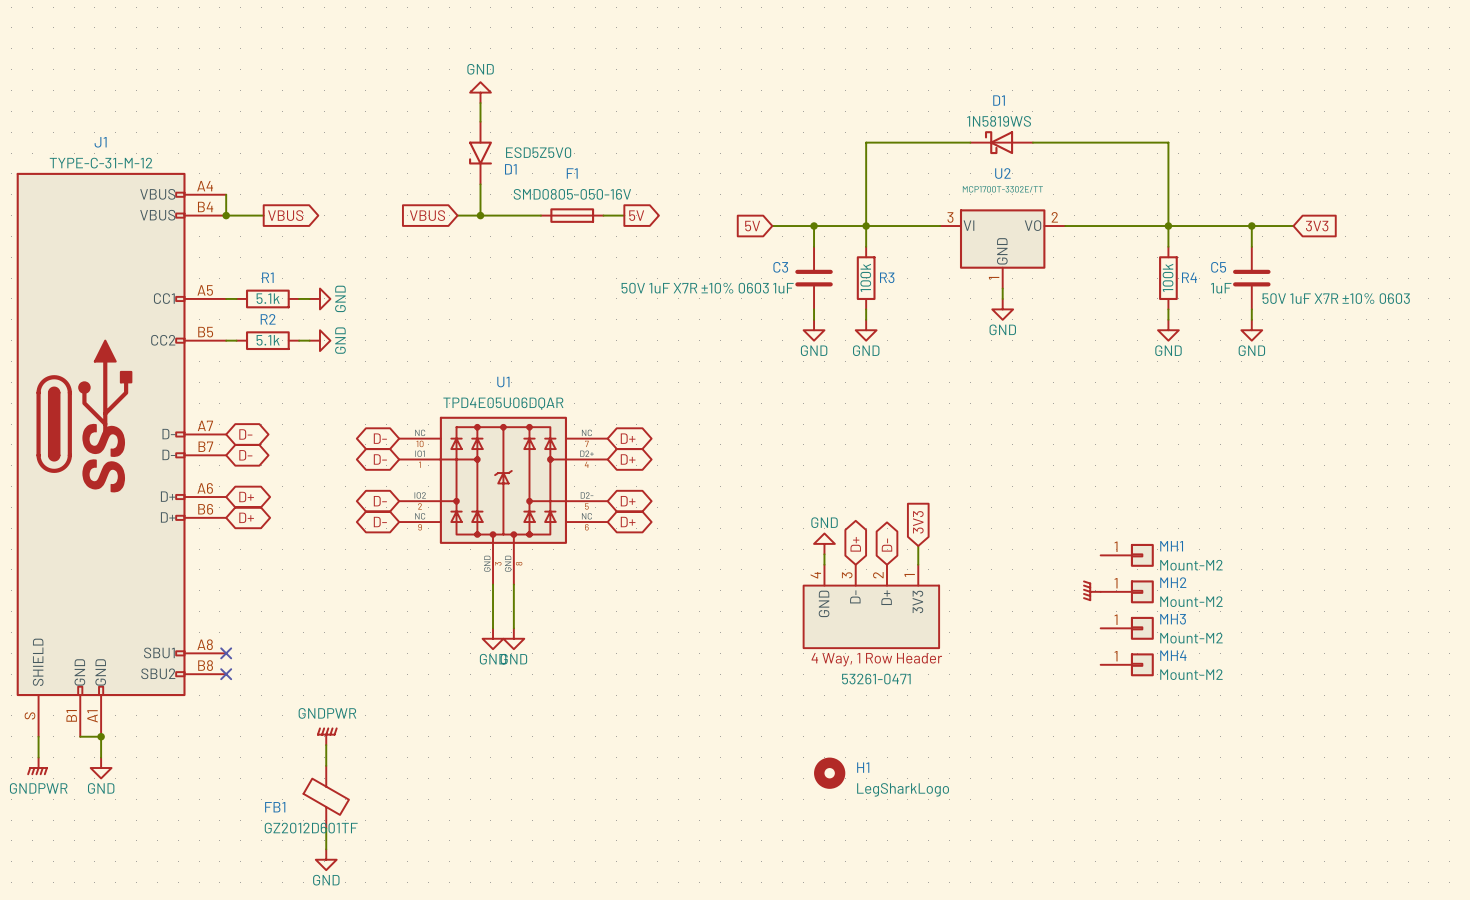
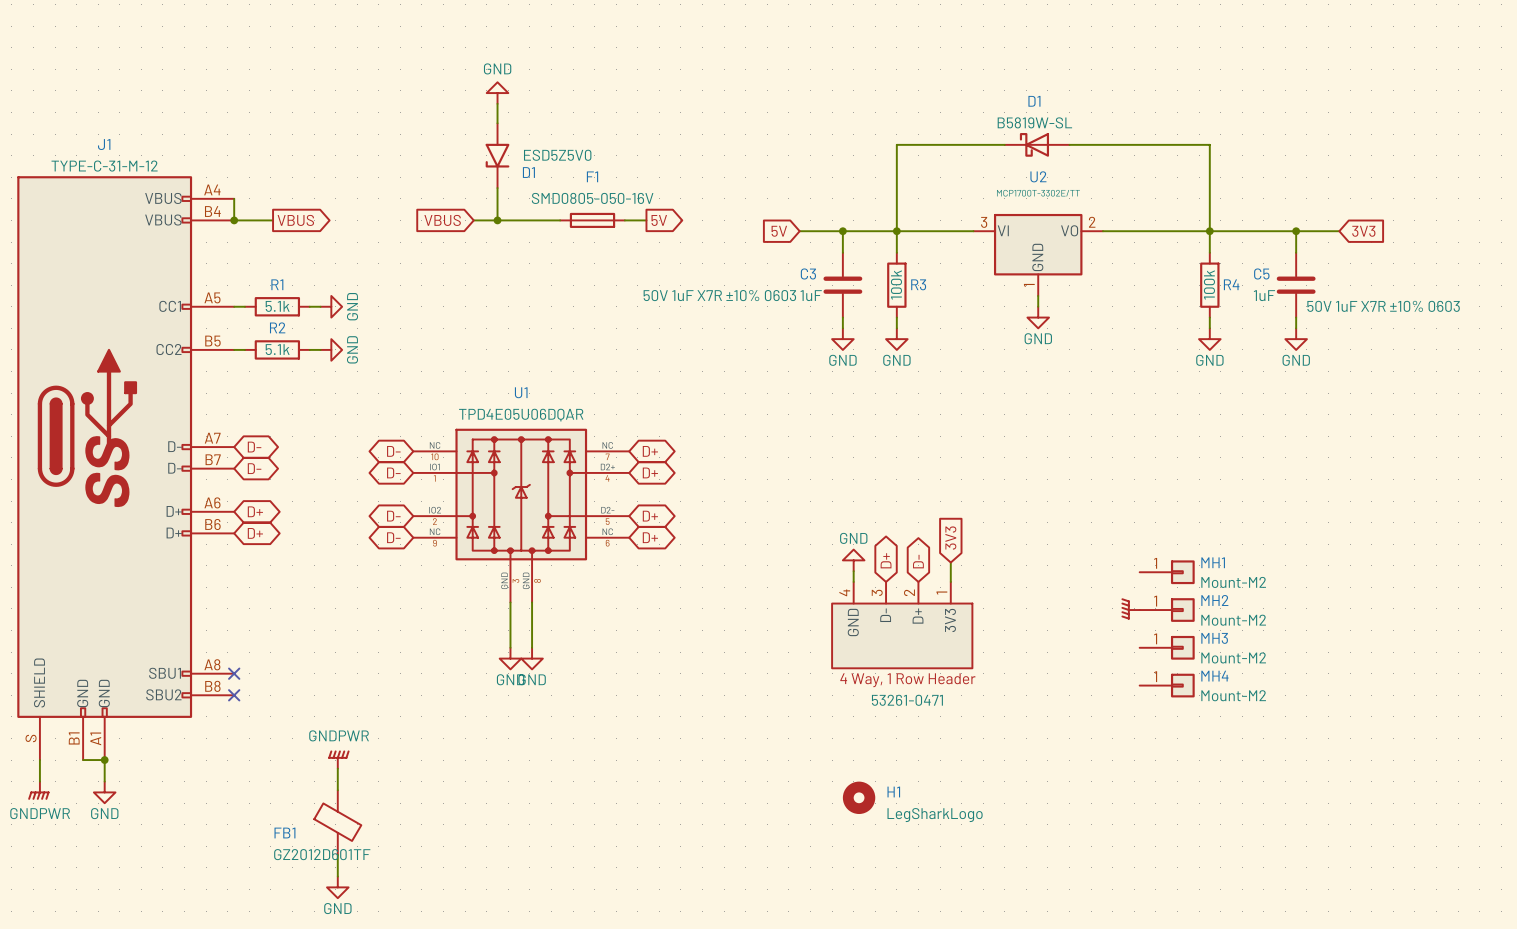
D1 value: 1N5819WS (999, 121) -> B5819W-SL (1034, 122)

